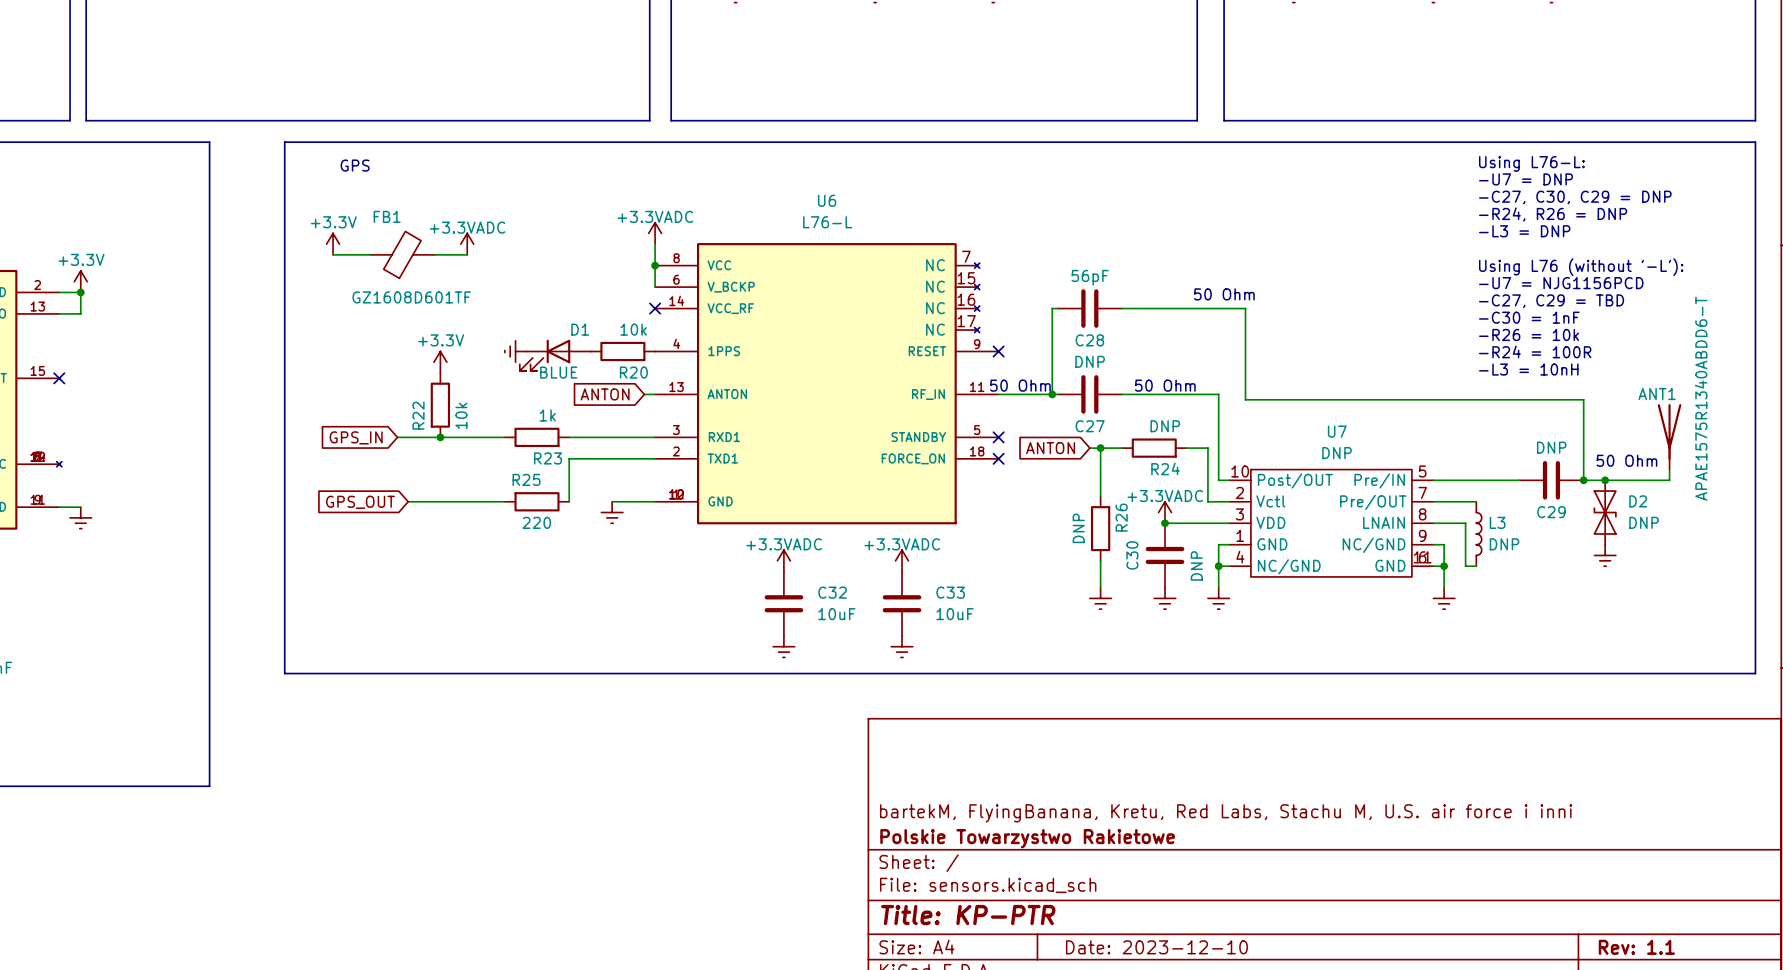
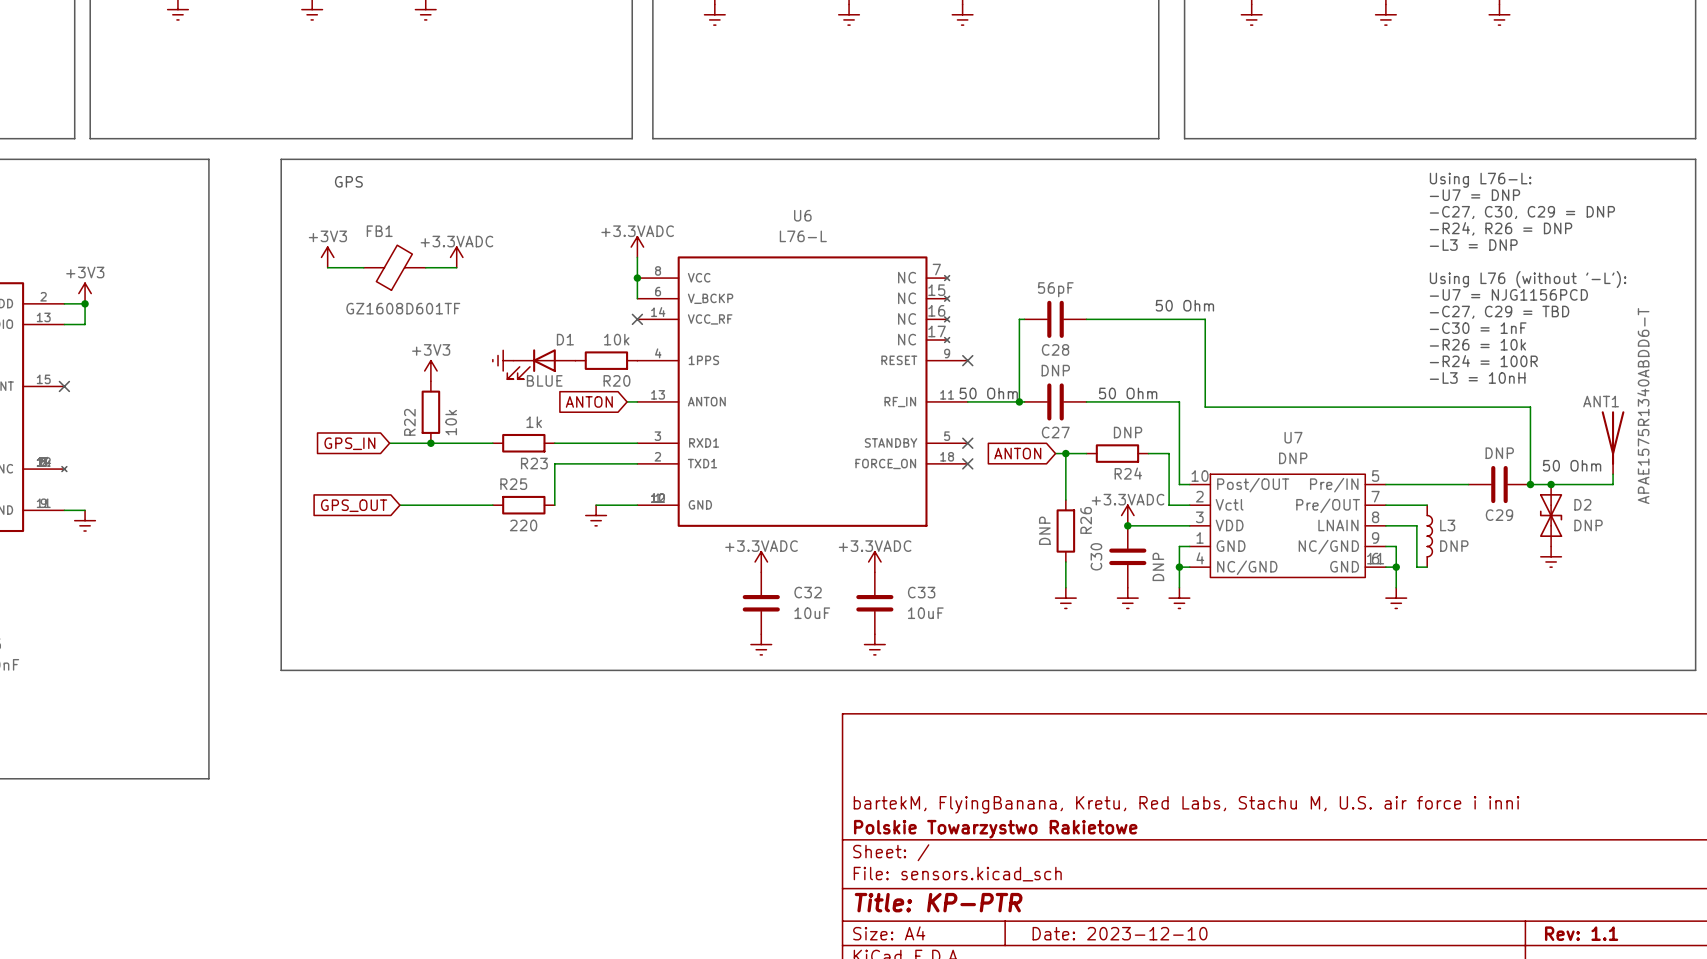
power symbol: +3.3V (333, 244) -> +3V3 (327, 257)
power symbol: +3.3V (80, 281) -> +3V3 (85, 293)
power symbol: +3.3V (440, 362) -> +3V3 (430, 370)

